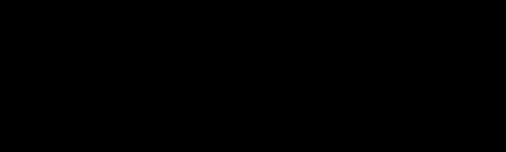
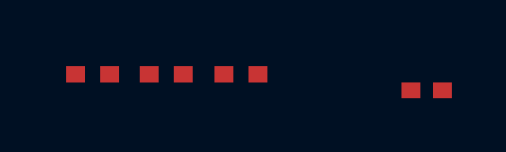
part: none -> (92, 74)
part: none -> (166, 74)
part: none -> (240, 74)
part: none -> (426, 90)

